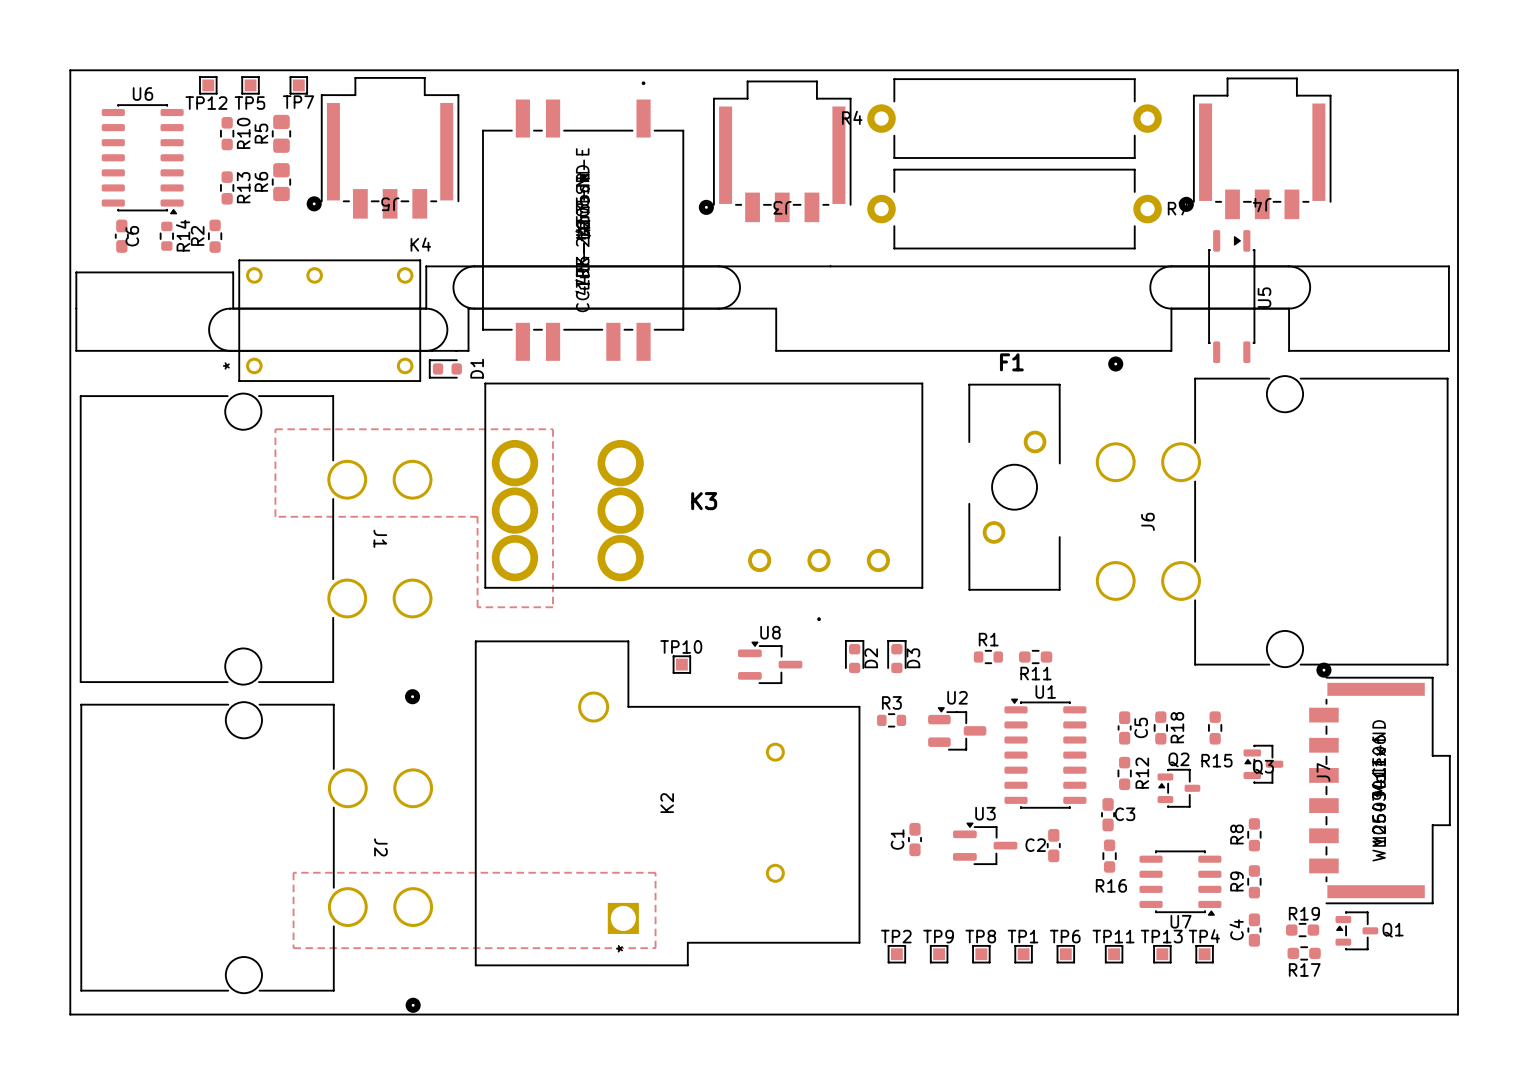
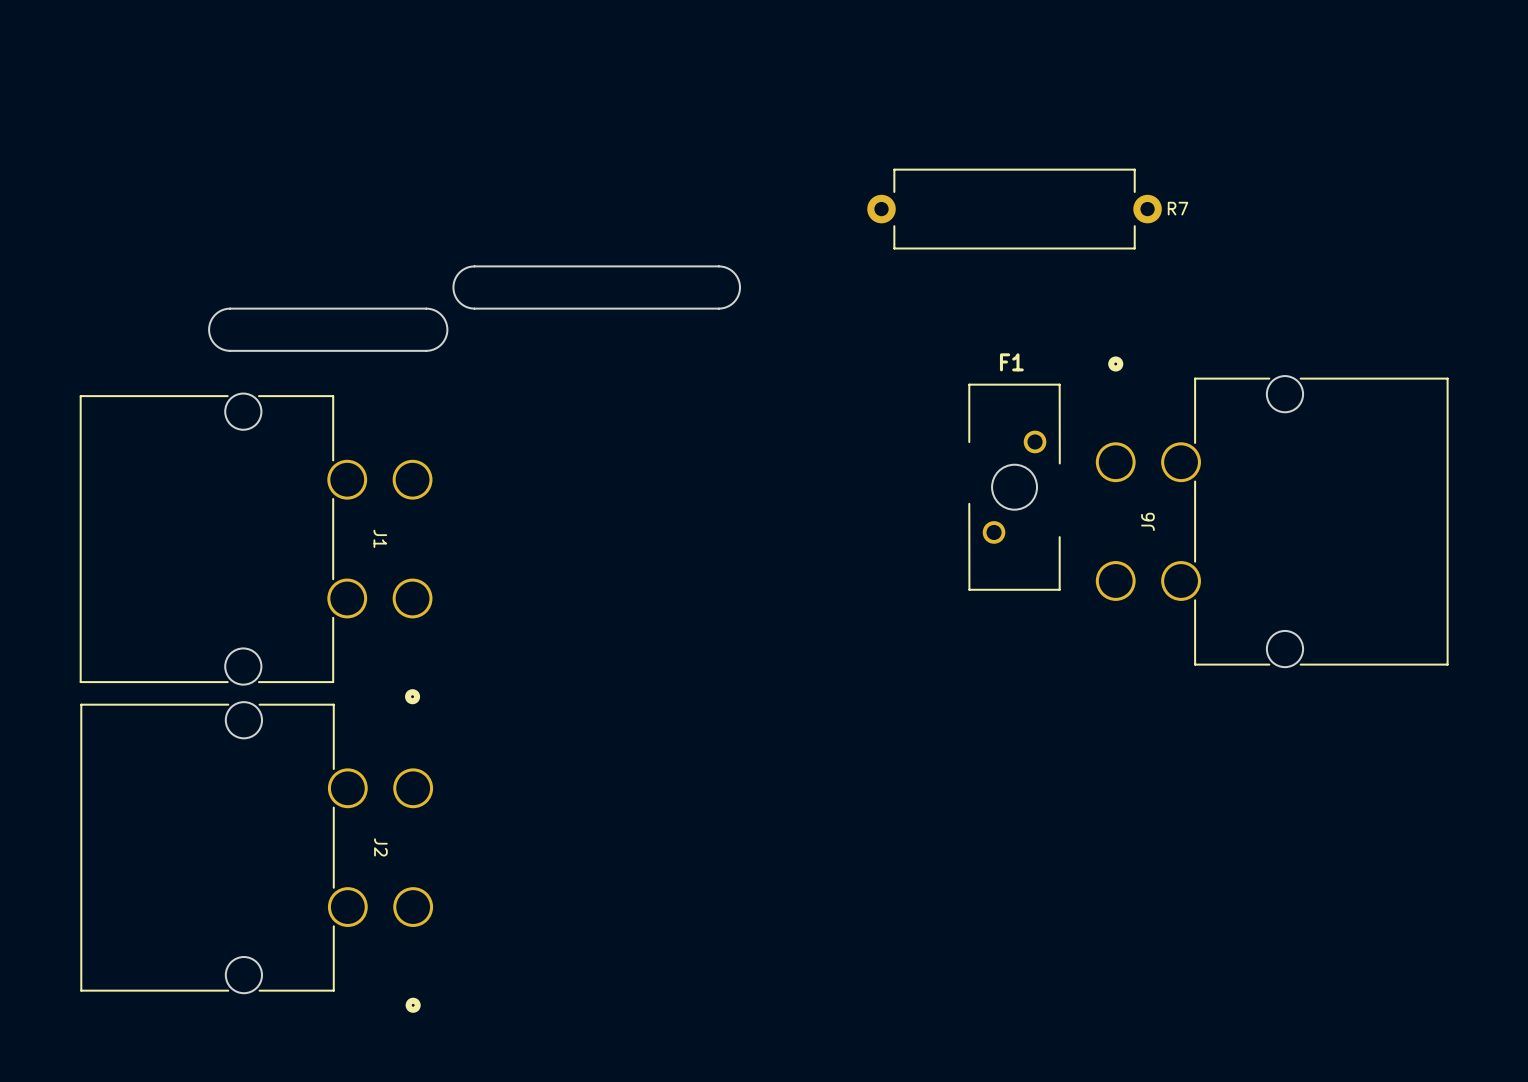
board edge: (70, 70) (1458, 70) (1458, 1014) (70, 1014) (70, 70) -> none
TP12: (208, 85) -> none
TP5: (250, 85) -> none
TP7: (298, 85) -> none
R4: (1014, 118) -> none
R10: (227, 133) -> none
R5: (281, 133) -> none
J5: (382, 147) -> none
J4: (1255, 148) -> none
J3: (775, 151) -> none
U6: (142, 159) -> none
R6: (281, 182) -> none
R13: (227, 187) -> none
part: (583, 221) -> none
C6: (121, 236) -> none
R14: (166, 236) -> none
R2: (215, 236) -> none
line: (426, 266) (1448, 266) (1448, 350) (1289, 350) (1289, 308) (1171, 308) (1171, 350) (776, 350) (776, 308) (468, 308) (468, 350) (76, 350) (76, 272) (233, 272) (233, 308) (426, 308) (426, 266) -> none
board edge: (1171, 266) (1291, 266) (1301, 270) (1306, 275) (1310, 290) (1303, 303) (1291, 308) (1168, 308) (1160, 305) (1154, 300) (1150, 287) (1151, 279) (1156, 272) (1163, 267) (1171, 266) -> none
U5: (1231, 296) -> none
K4: (329, 320) -> none
D1: (445, 368) -> none
zone outline: (275, 429) (552, 429) (552, 607) (477, 607) (477, 516) (275, 516) (275, 429) -> none
K3: (703, 501) -> none
D2: (854, 656) -> none
D3: (896, 656) -> none
R1: (988, 657) -> none
R11: (1035, 657) -> none
U8: (770, 662) -> none
TP10: (681, 664) -> none
R3: (891, 720) -> none
C5: (1124, 727) -> none
R18: (1160, 727) -> none
R15: (1215, 727) -> none
U2: (957, 728) -> none
U1: (1045, 753) -> none
Q3: (1263, 764) -> none
R12: (1124, 773) -> none
J7: (1379, 783) -> none
Q2: (1178, 788) -> none
K2: (667, 803) -> none
C3: (1108, 814) -> none
R8: (1254, 834) -> none
C1: (914, 839) -> none
U3: (985, 843) -> none
C2: (1053, 845) -> none
R16: (1109, 856) -> none
zone outline: (293, 872) (293, 948) (655, 948) (655, 872) (293, 872) -> none
R9: (1254, 881) -> none
U7: (1180, 883) -> none
C4: (1254, 930) -> none
R19: (1302, 930) -> none
Q1: (1356, 930) -> none
R17: (1304, 953) -> none
TP2: (896, 954) -> none
TP9: (939, 954) -> none
TP8: (981, 954) -> none
TP1: (1023, 954) -> none
TP6: (1065, 954) -> none
TP11: (1114, 954) -> none
TP13: (1162, 954) -> none
TP4: (1204, 954) -> none

